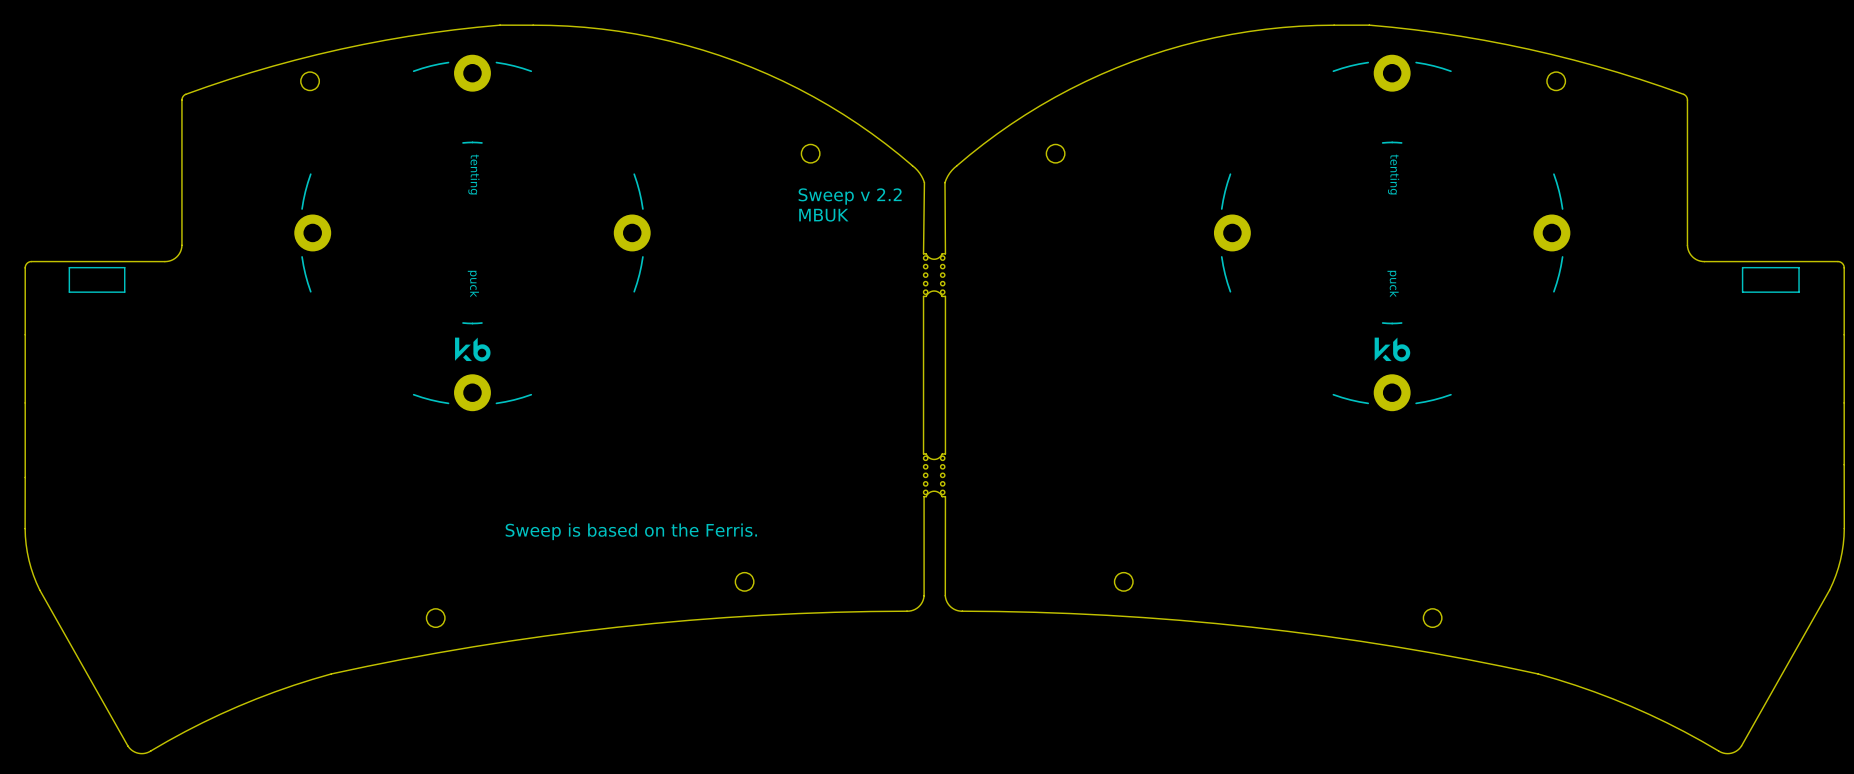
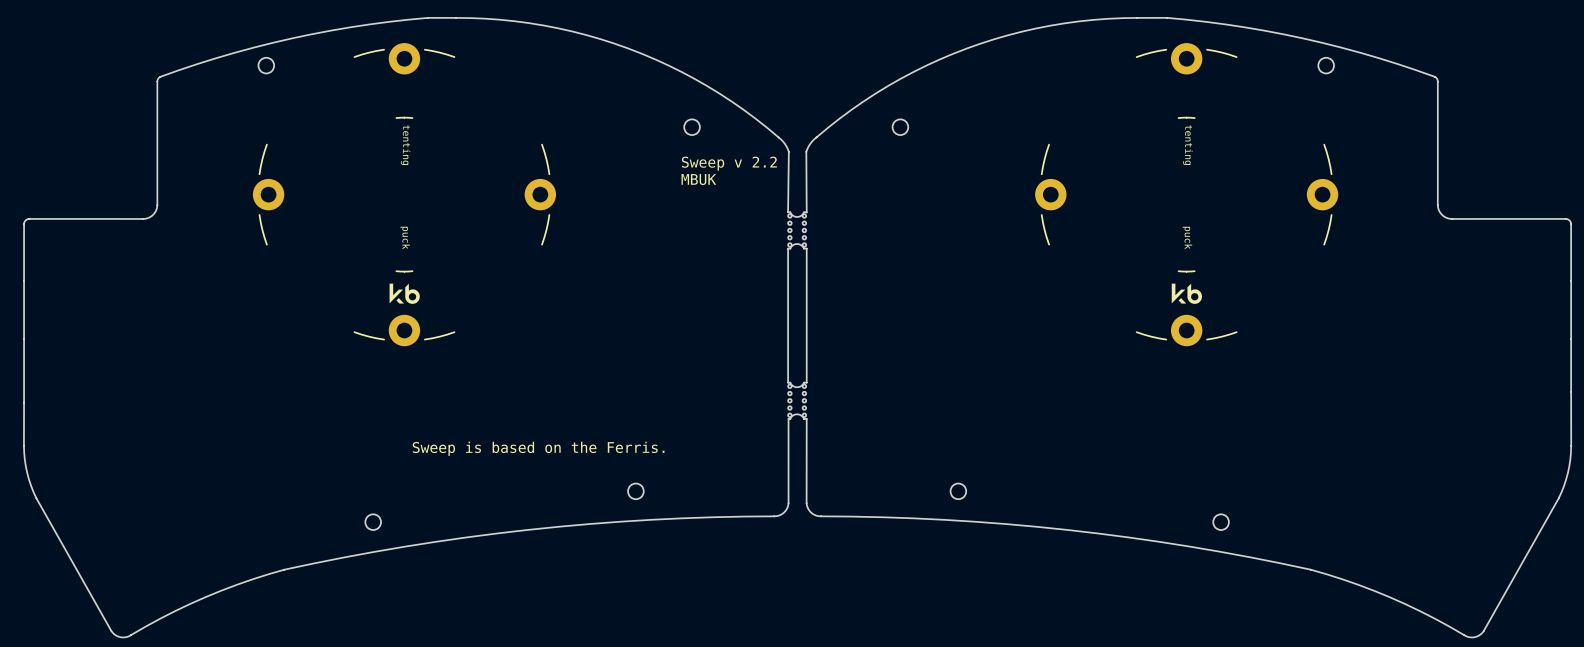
line: (124, 267) (69, 267) (69, 292) (124, 292) (124, 267) -> none
line: (1799, 267) (1742, 267) (1742, 292) (1799, 292) (1799, 267) -> none

